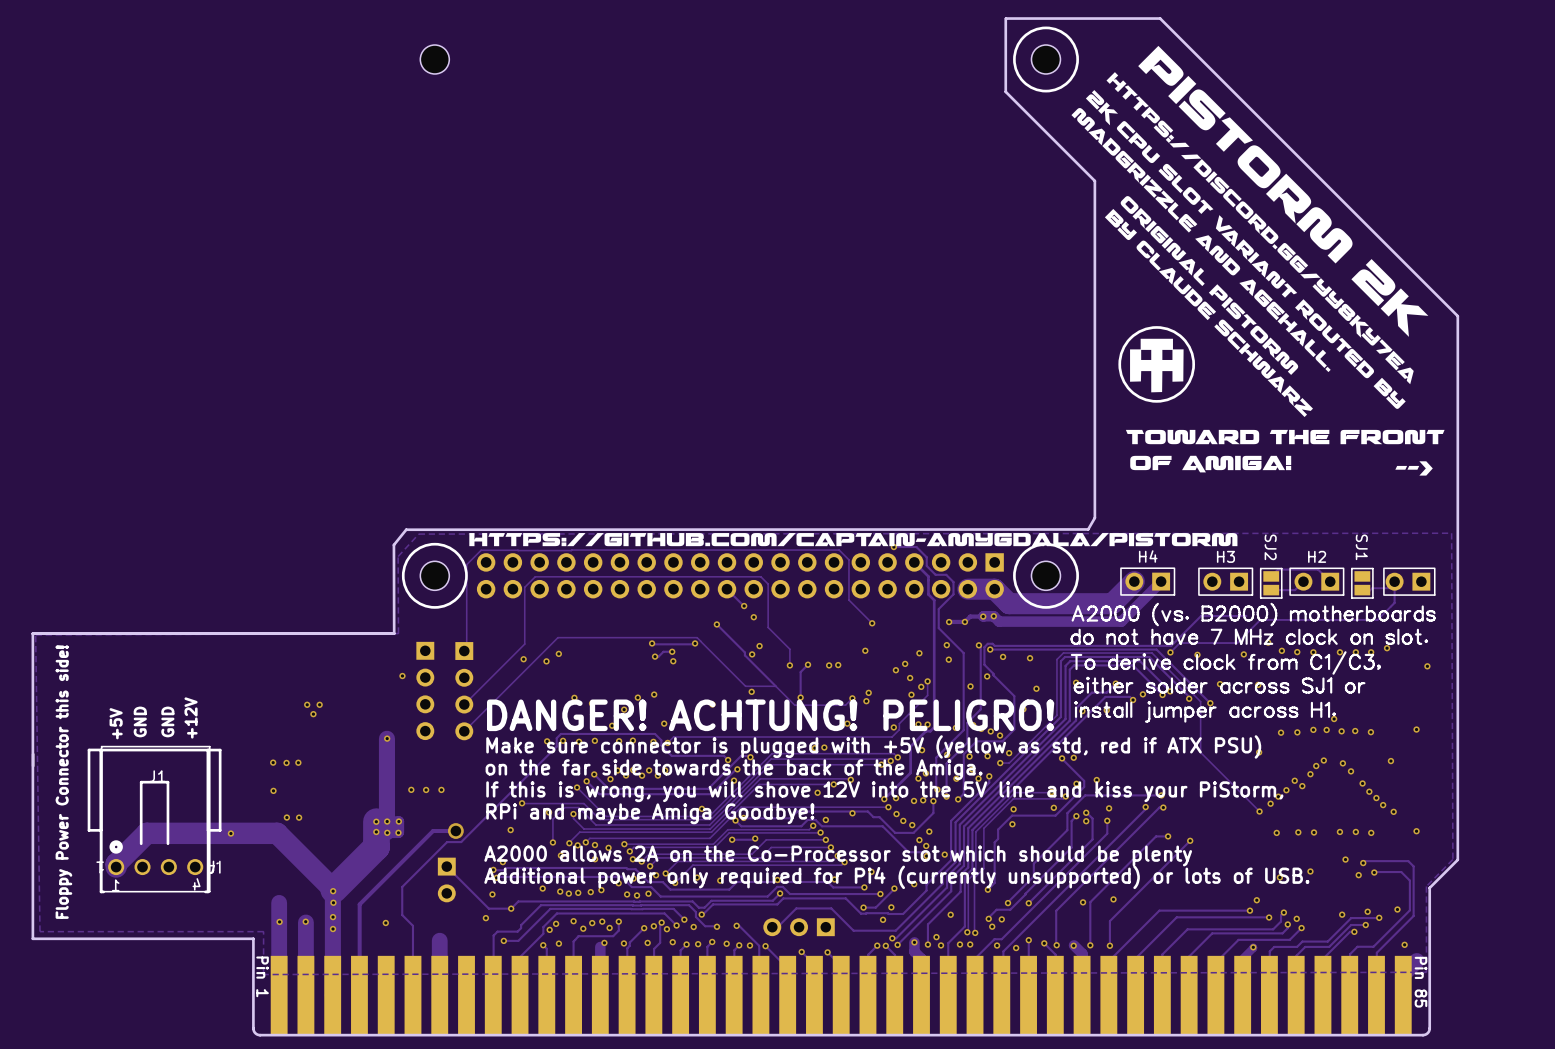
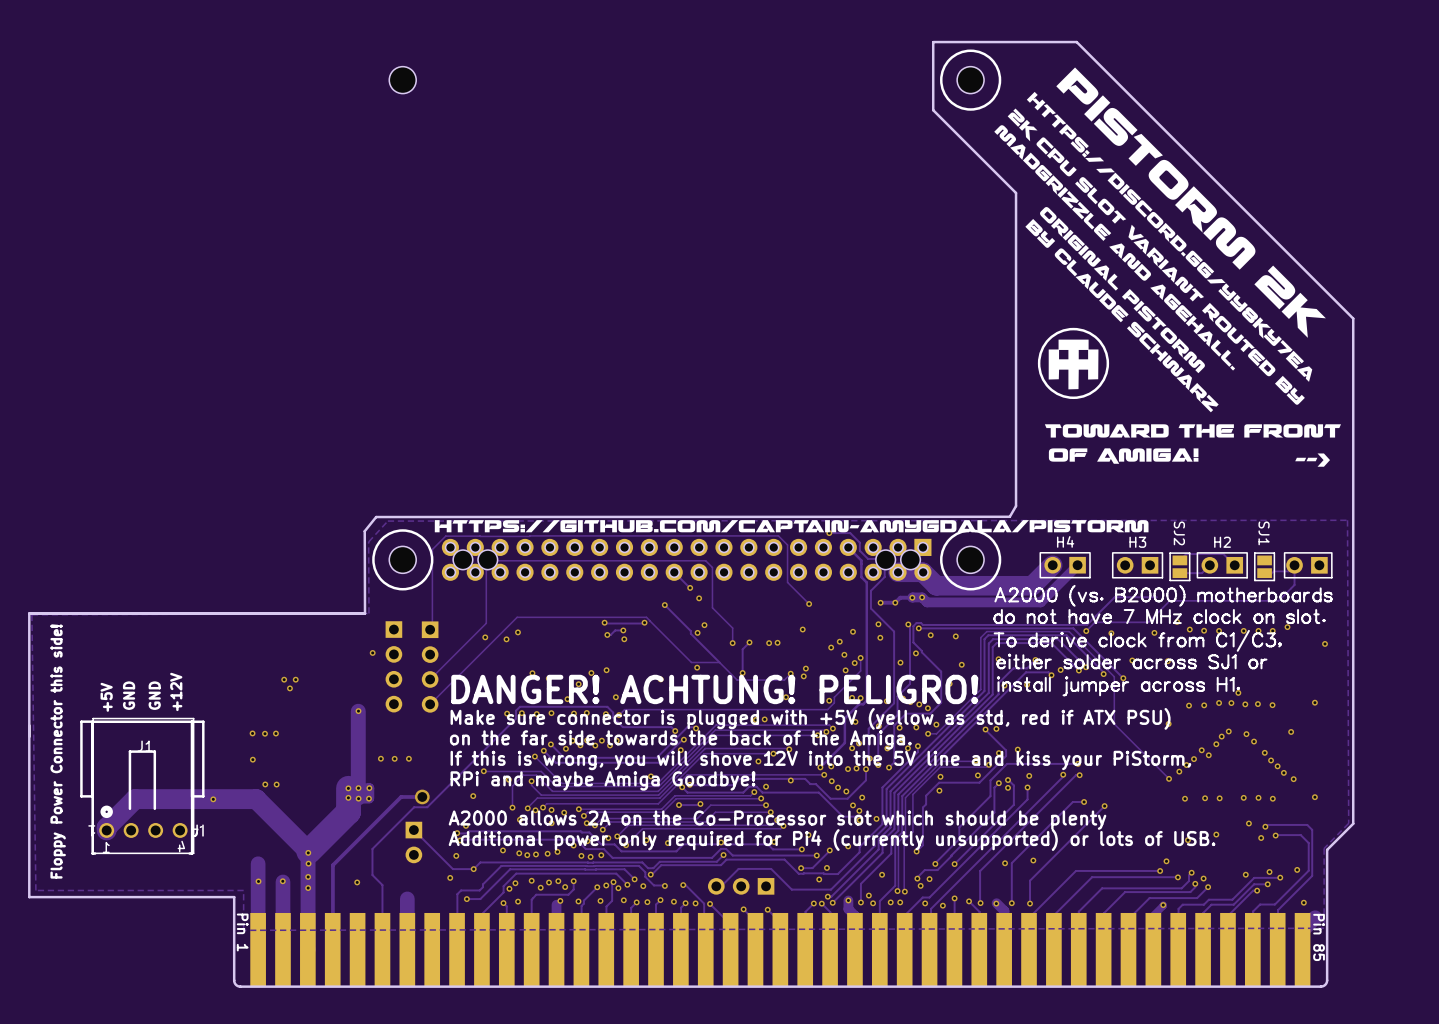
part: none -> (686, 559)

